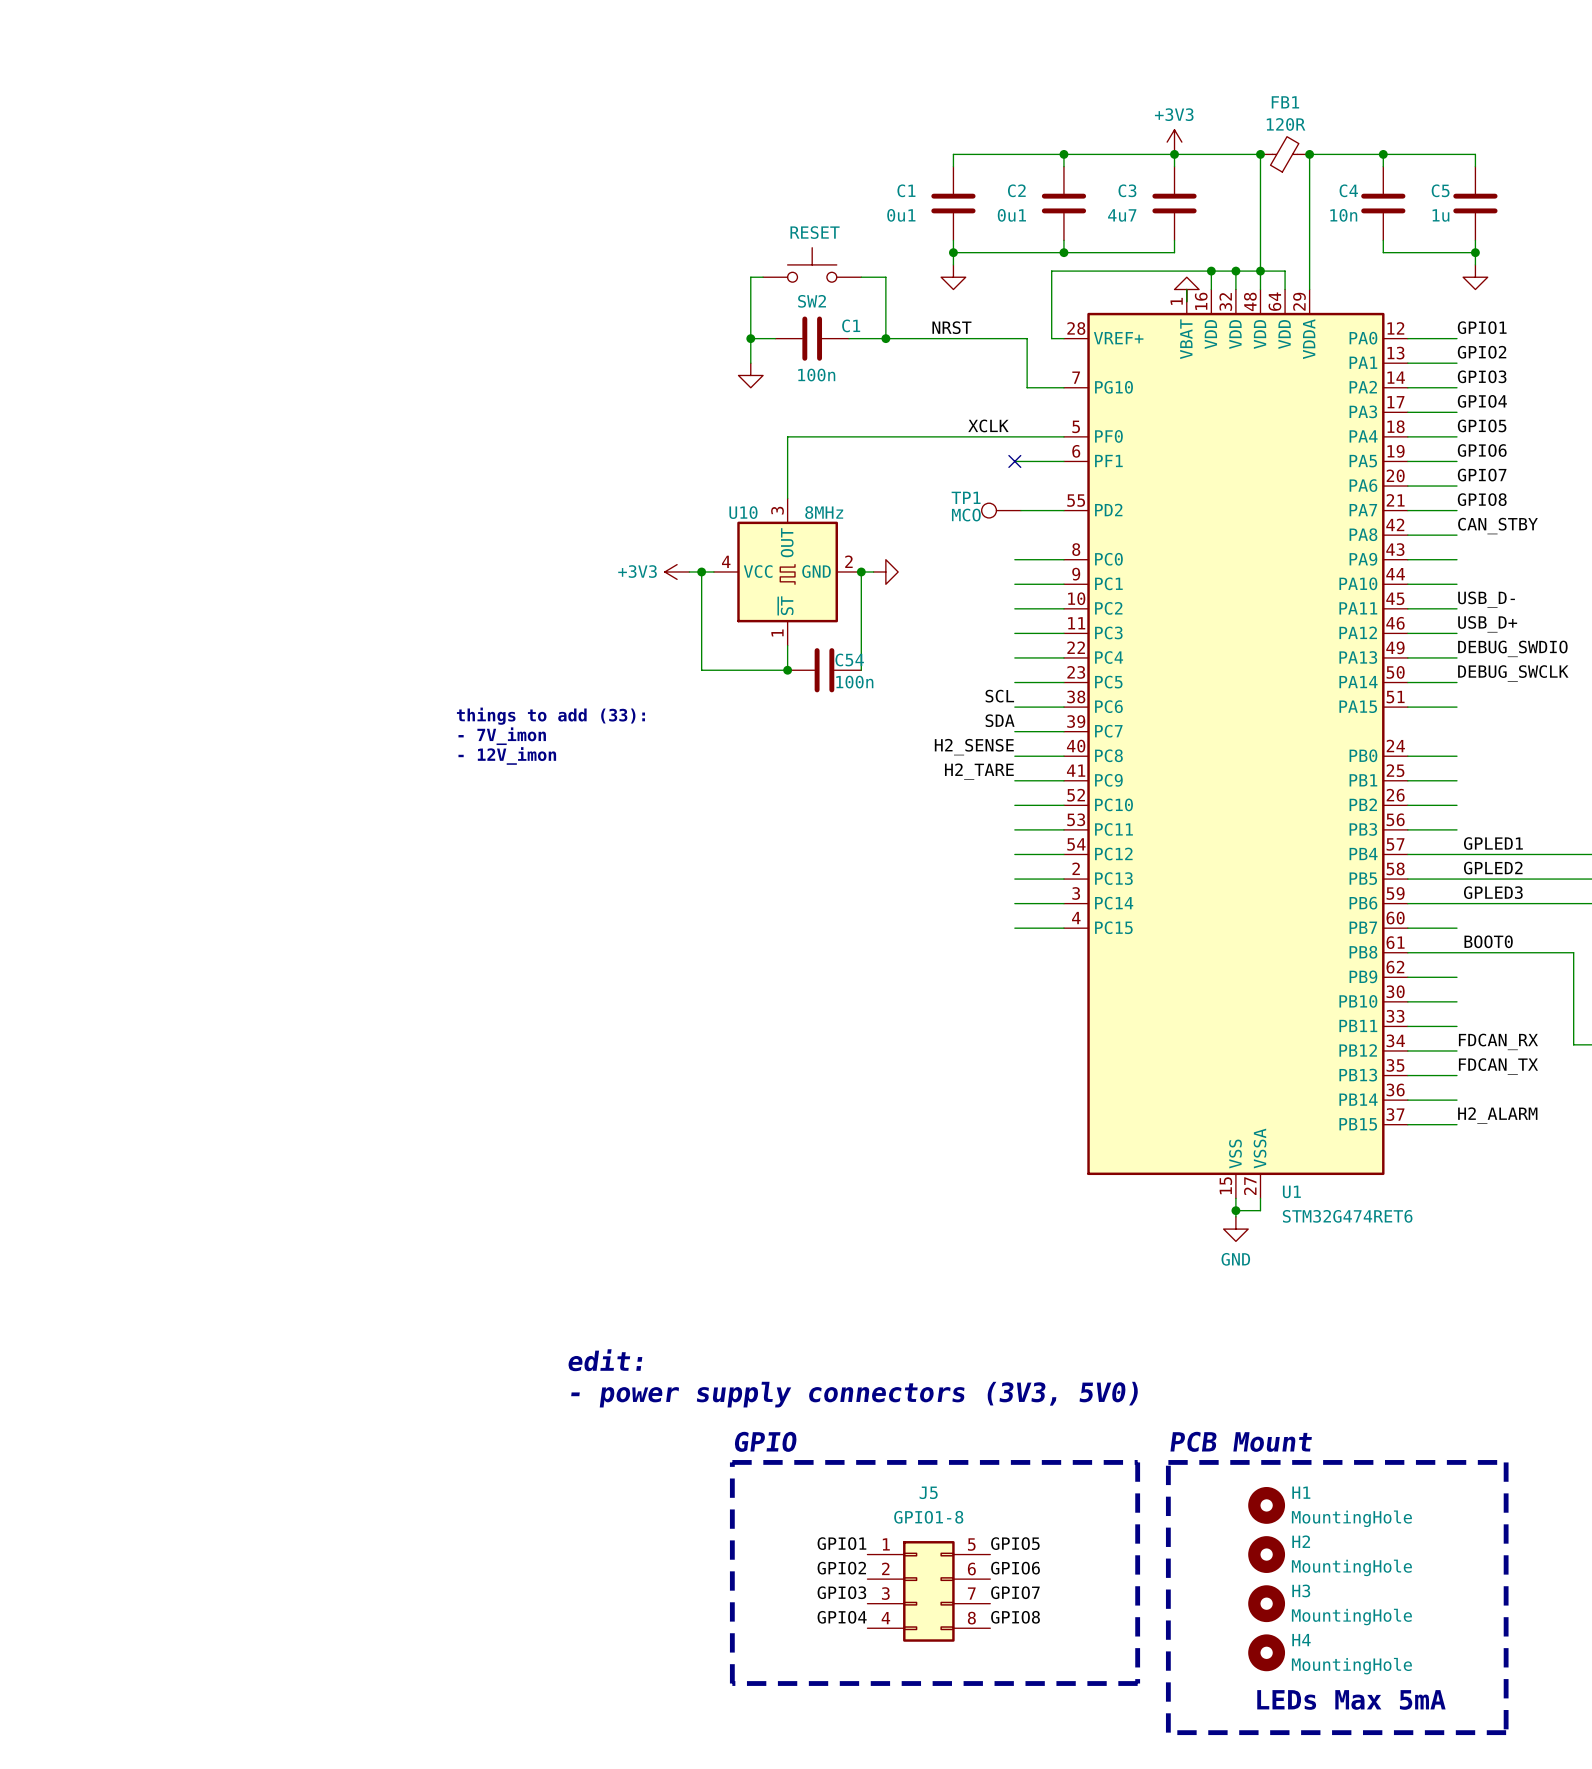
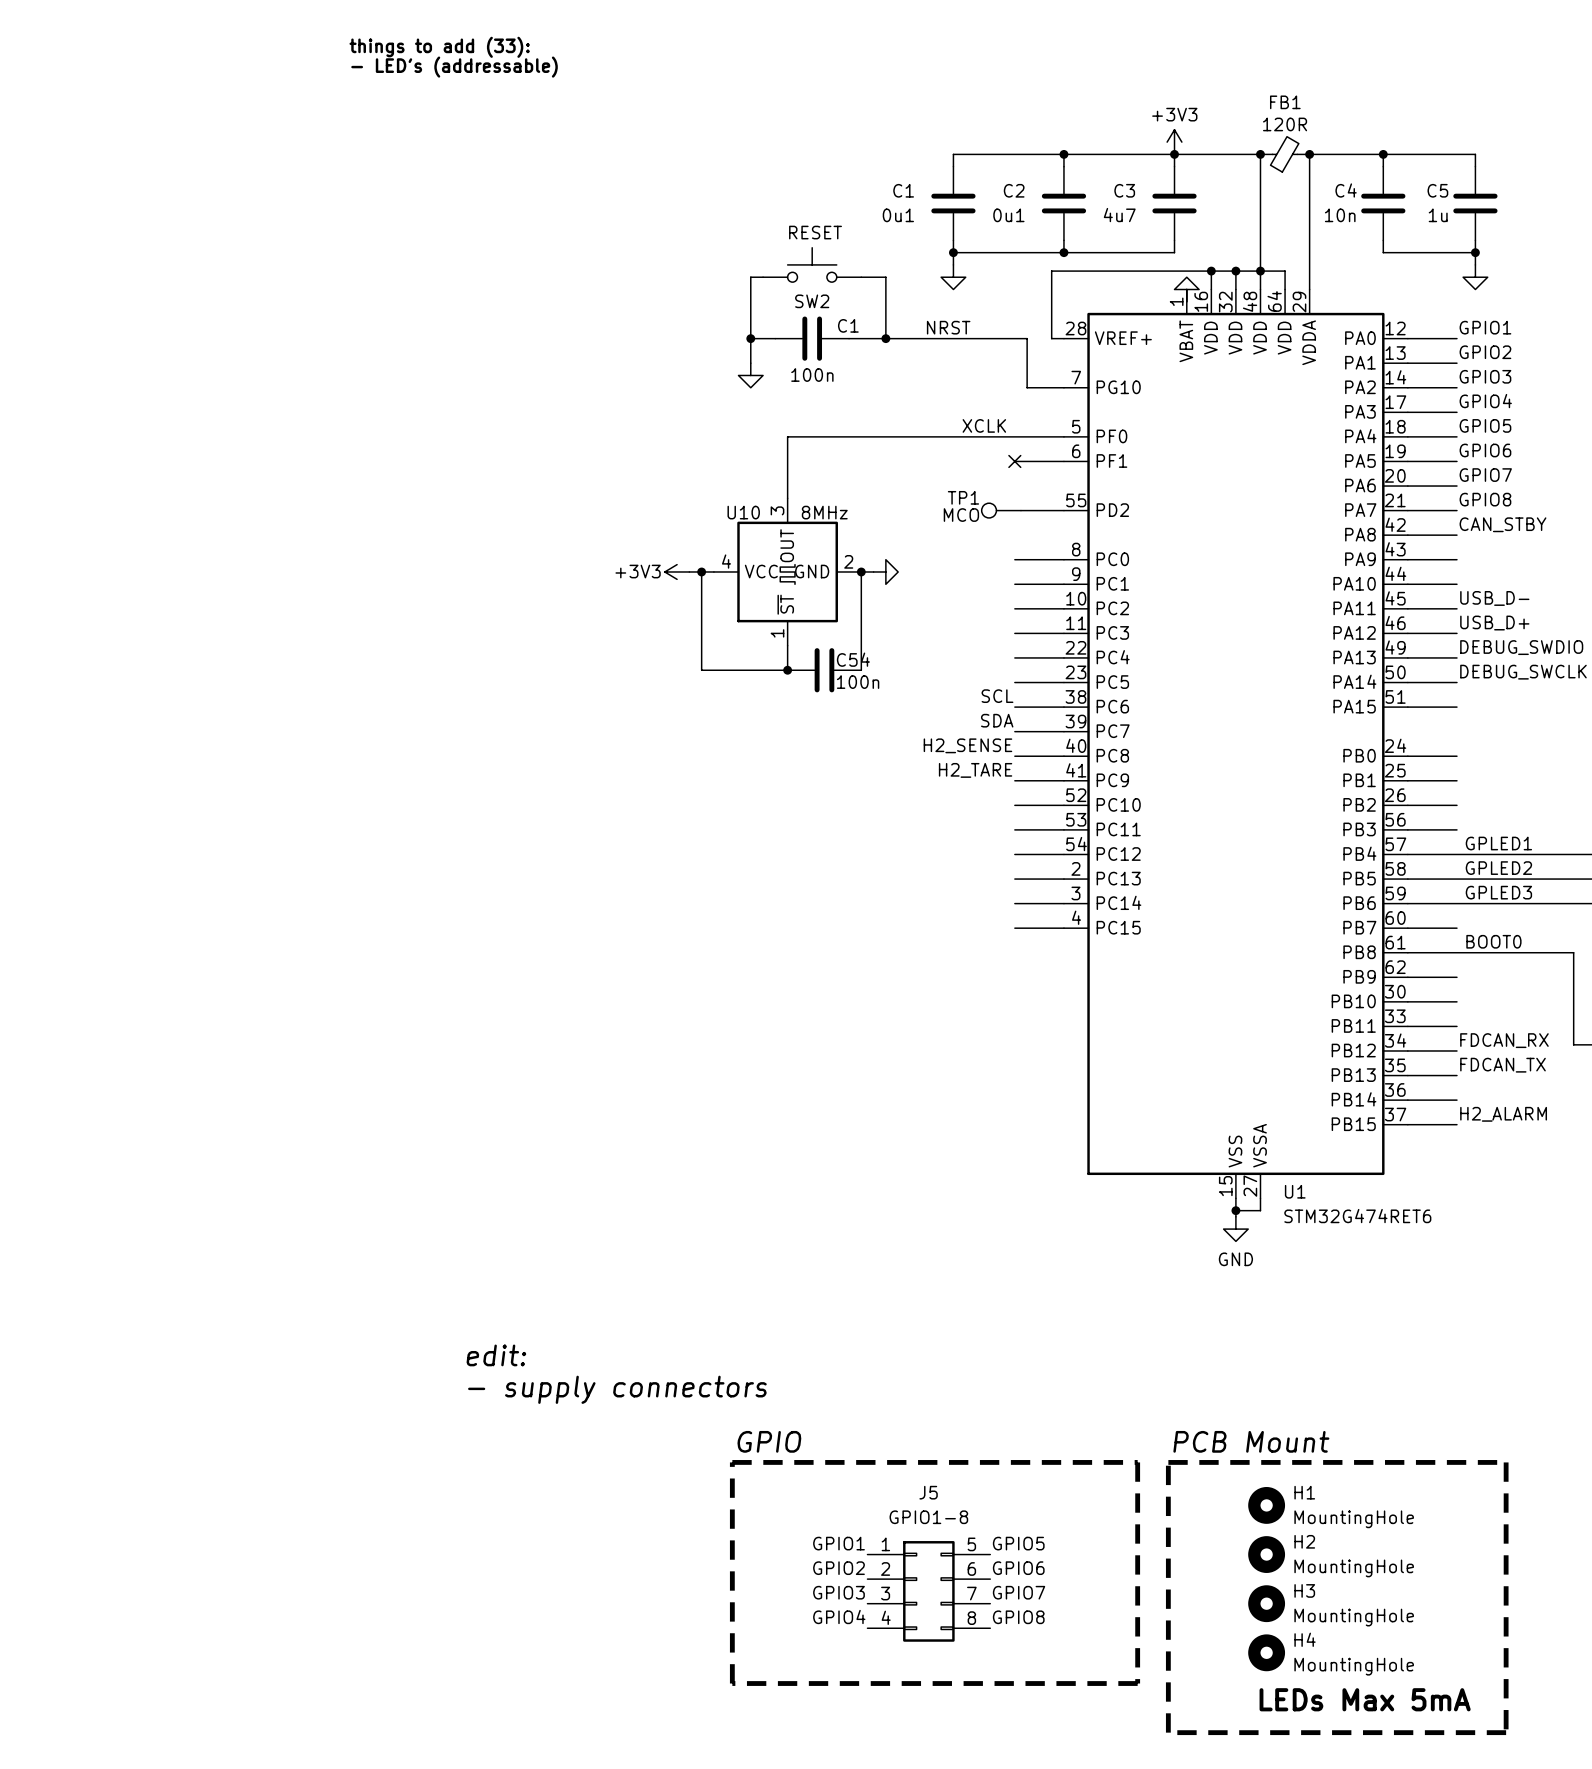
text: none -> things to add (33): (439, 47)
text: none -> - LED's (addressable) (454, 67)
text: things to add (33): (550, 716) -> none
text: - 7V_imon (502, 736) -> none
text: - 12V_imon (507, 755) -> none
text position: edit: (605, 1360) -> edit: (496, 1355)
text: - power supply connectors (3V3, 5V0) (854, 1394) -> - supply connectors (617, 1389)

